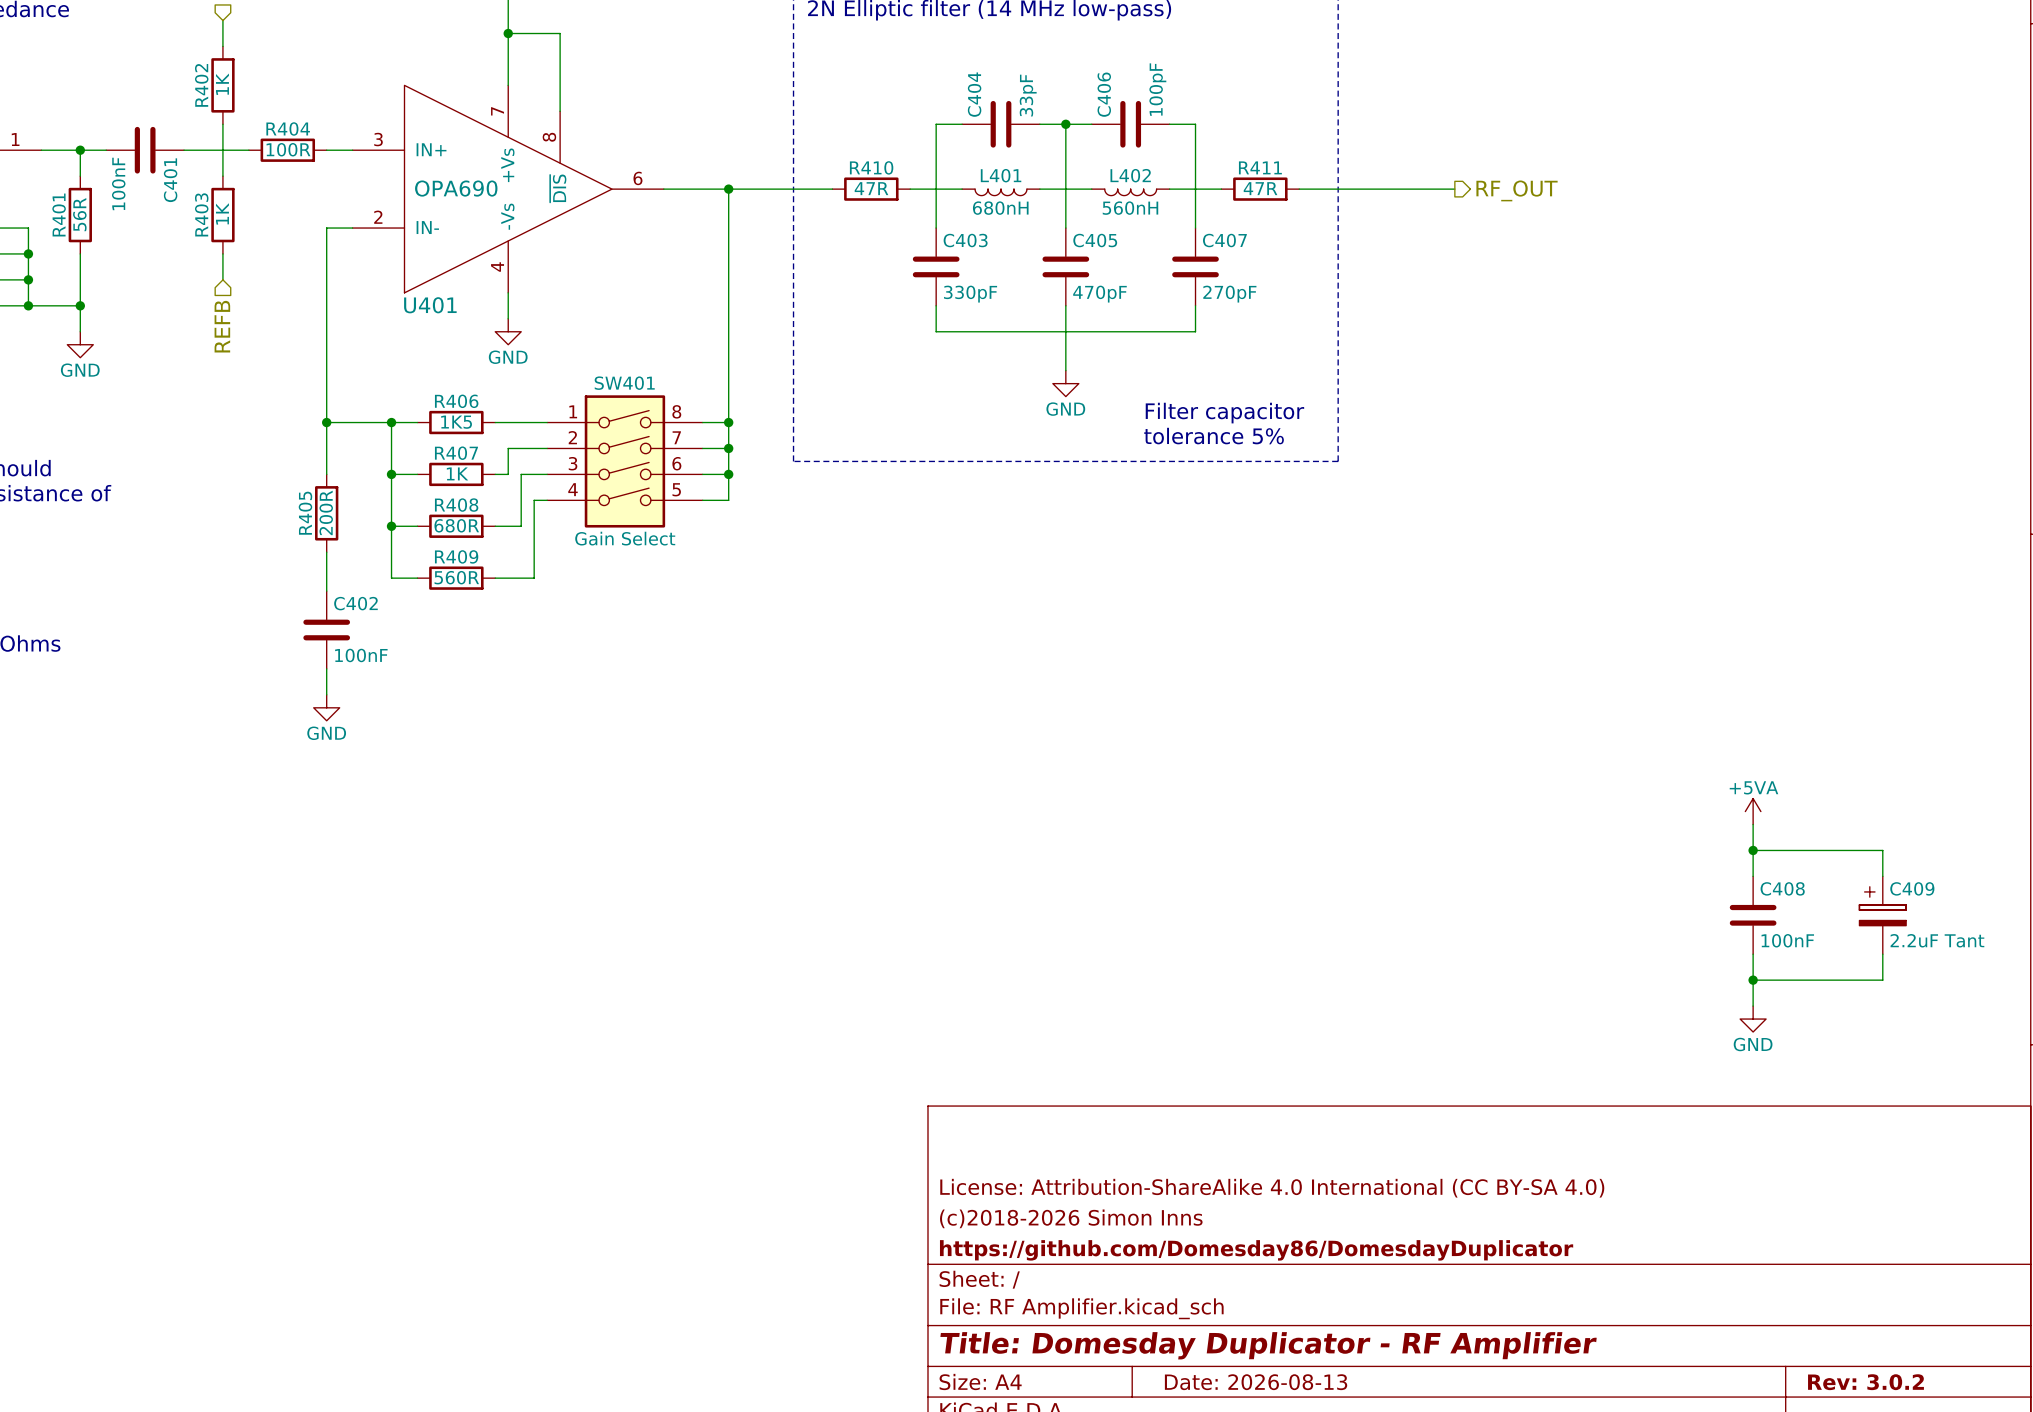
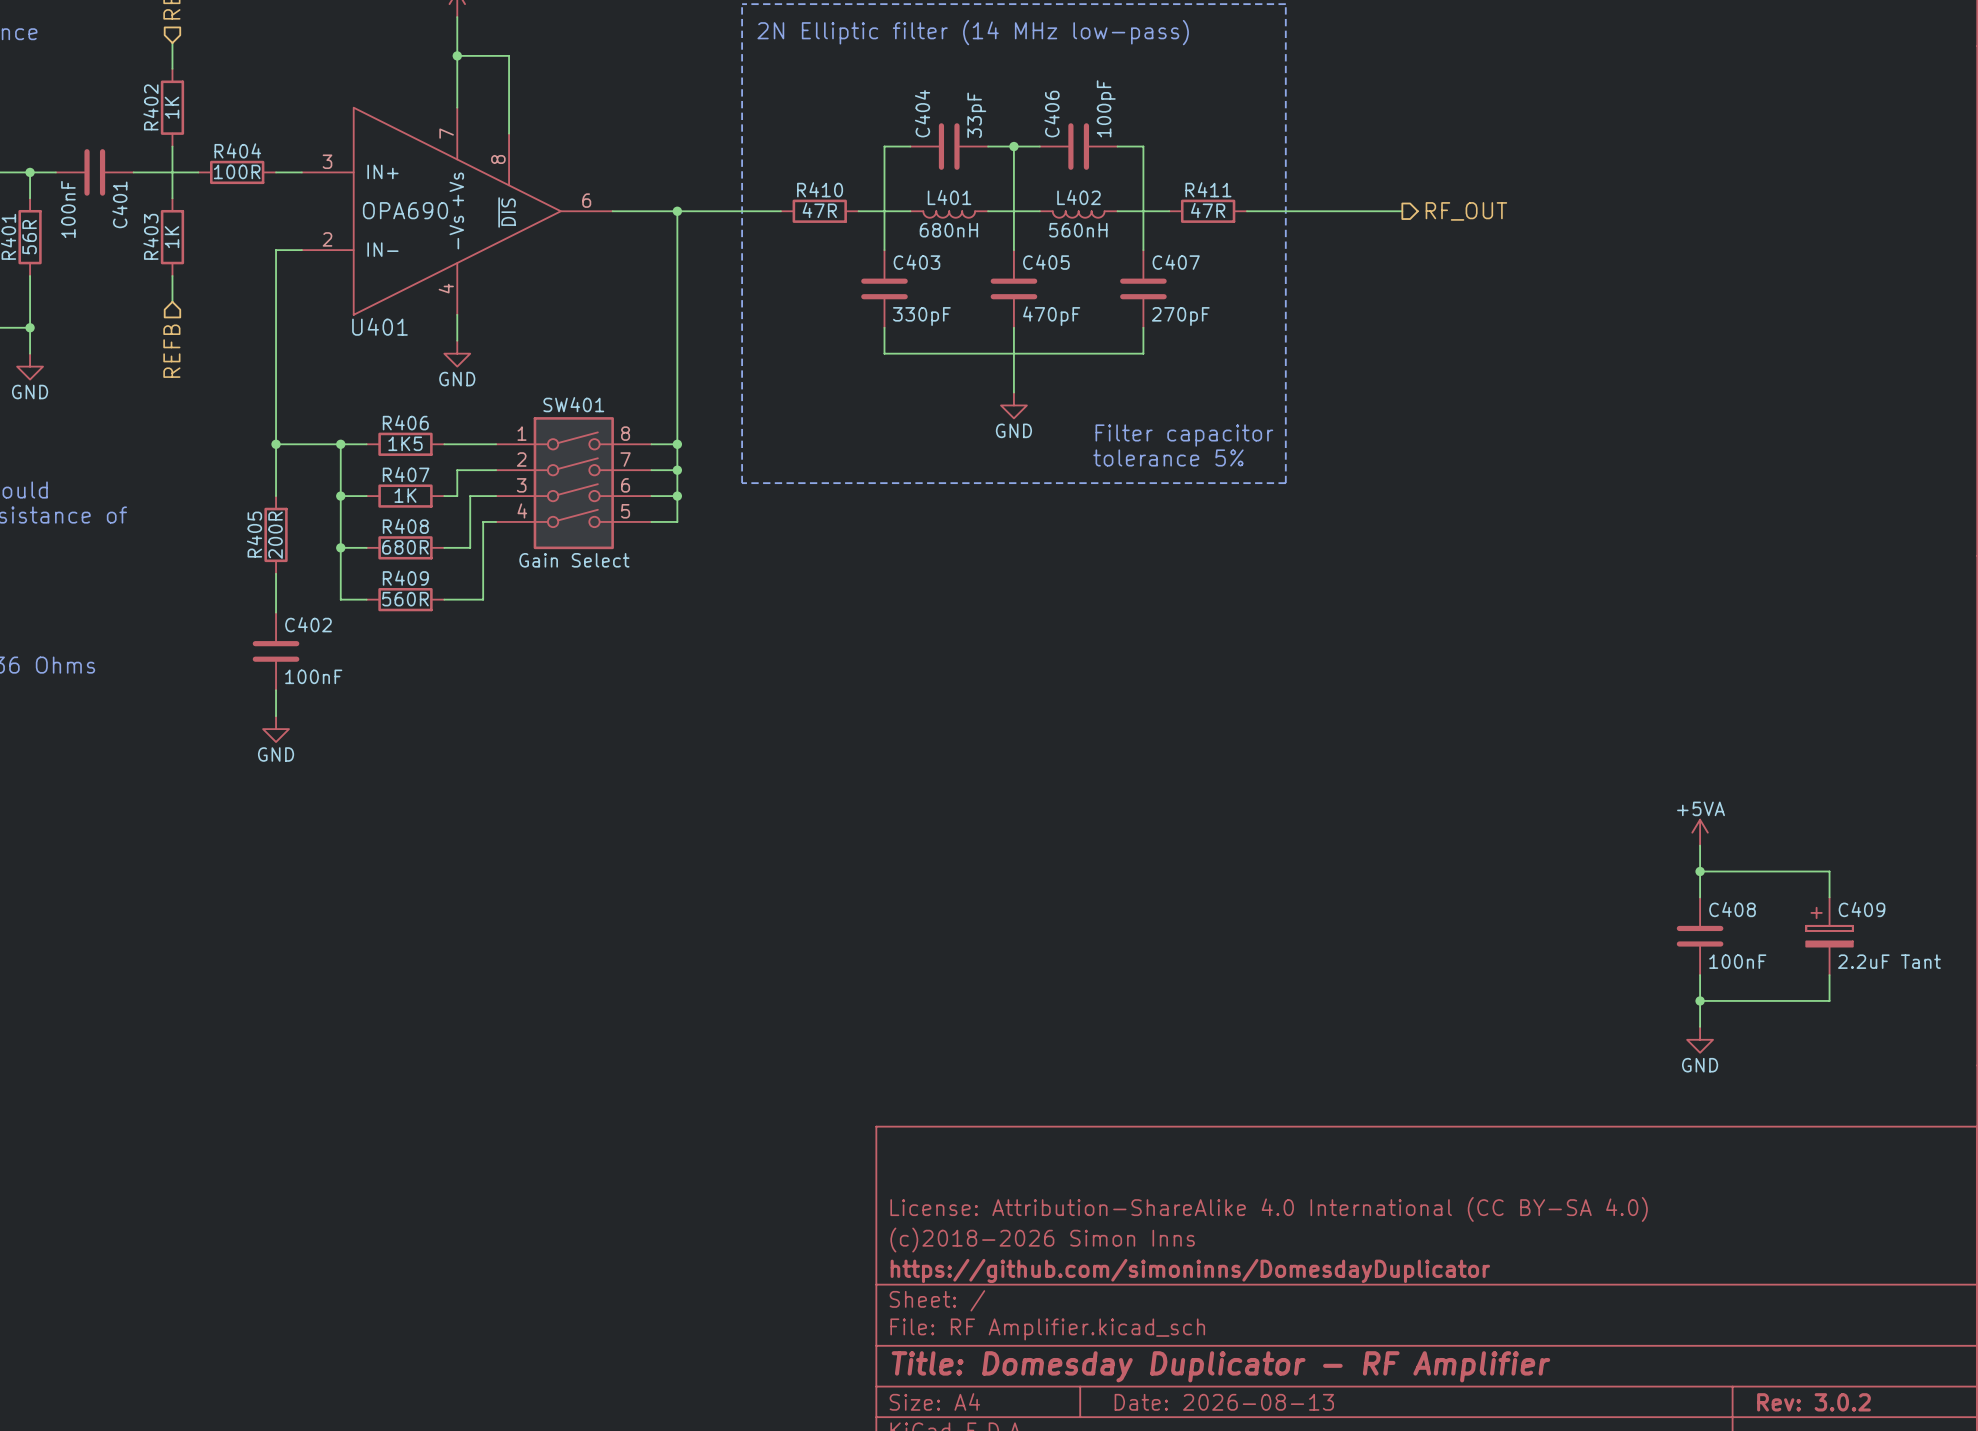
title block: https://github.com/Domesday86/DomesdayDuplicator (1256, 1250) -> https://github.com/simoninns/DomesdayDuplicator (1190, 1270)

